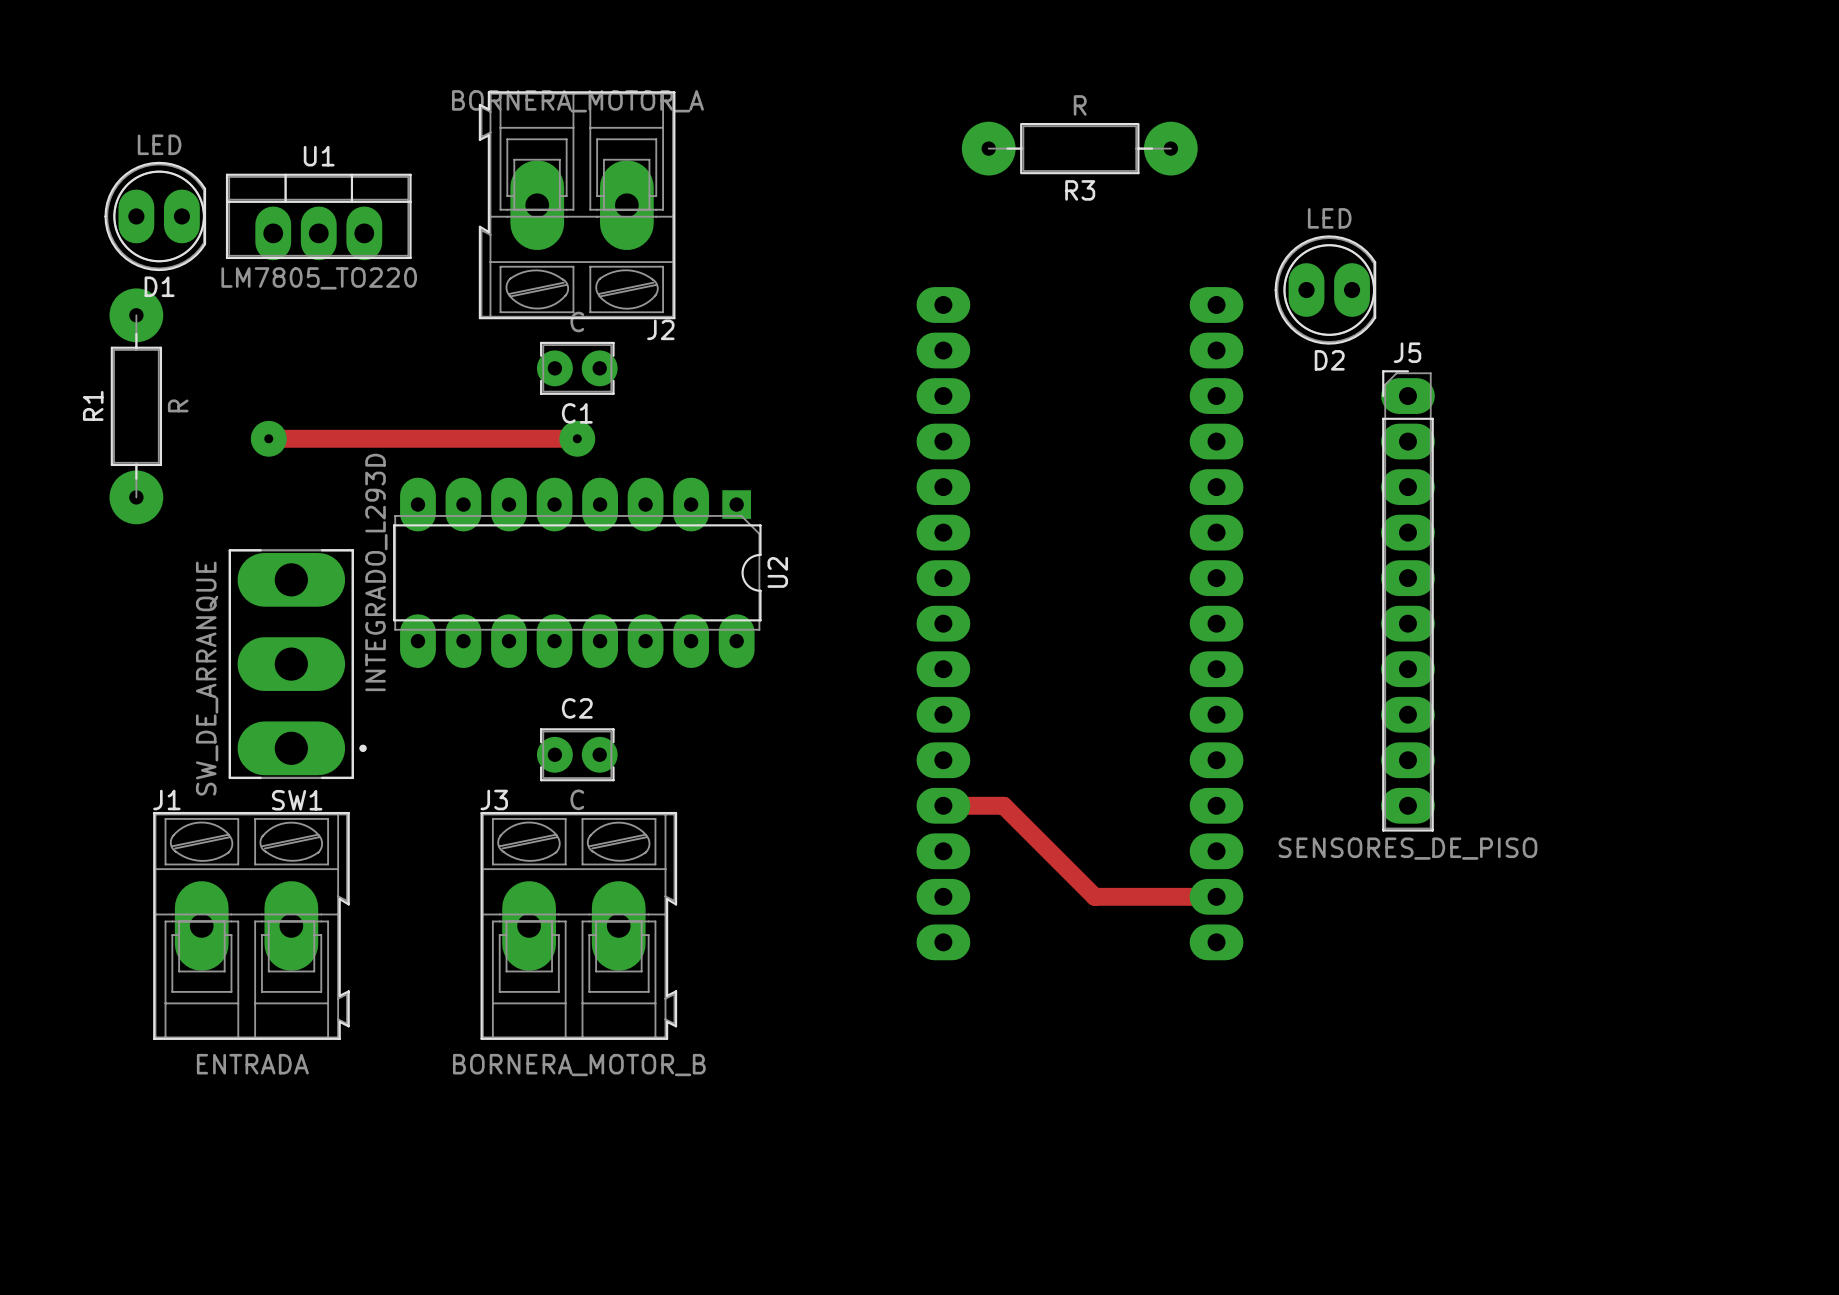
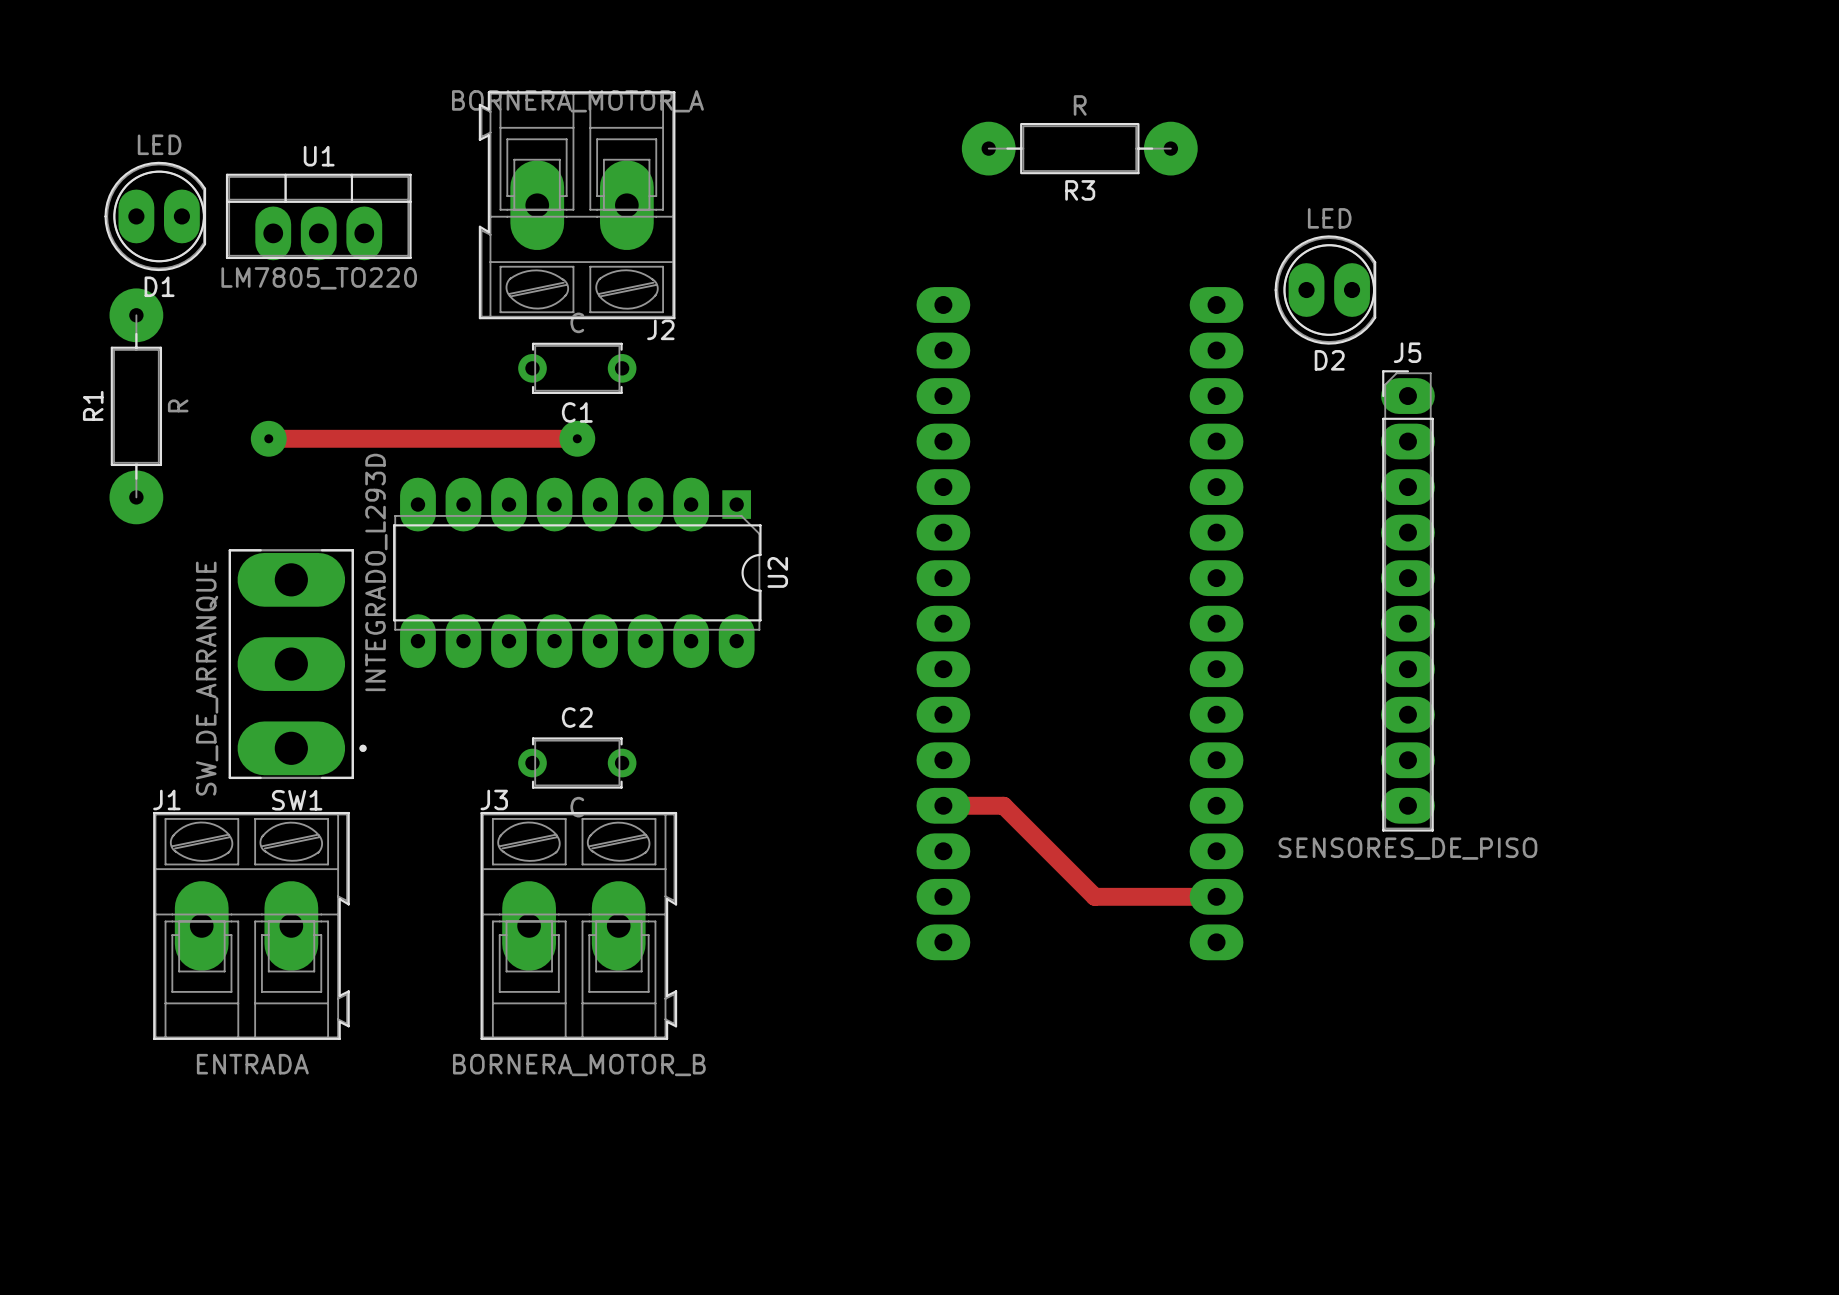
C1 footprint: [536, 341, 618, 395] -> [518, 342, 637, 394]
C2 footprint: [536, 728, 618, 782] -> [518, 737, 637, 789]

